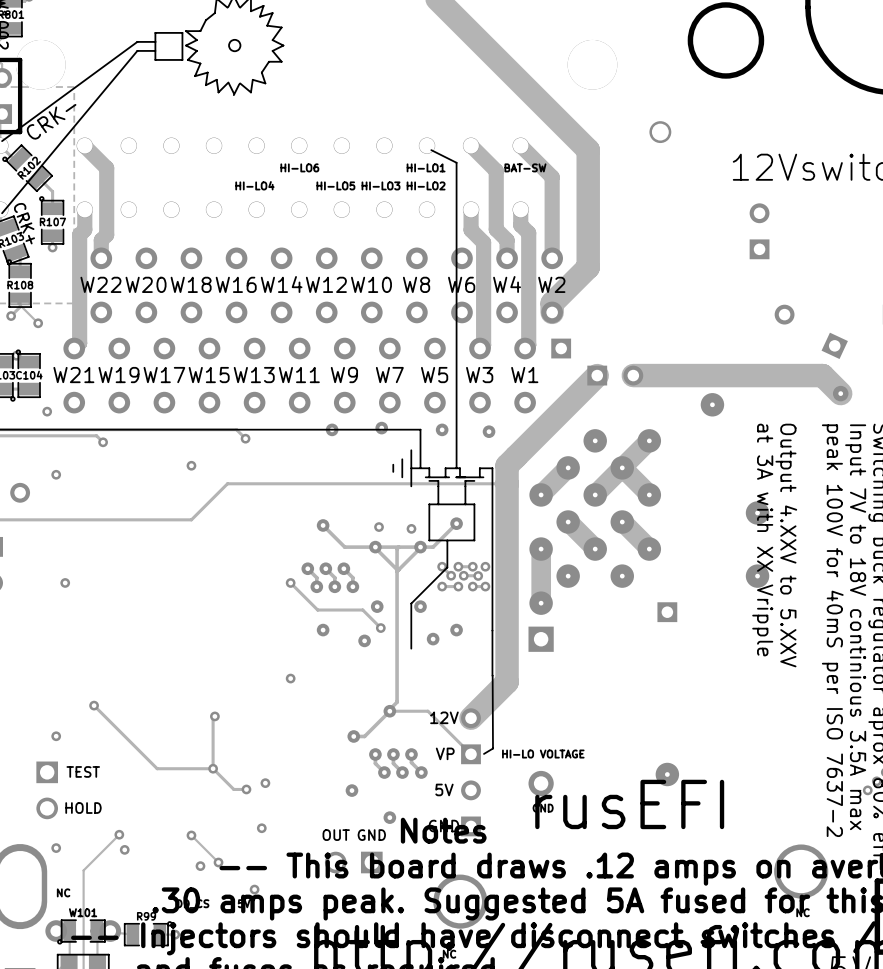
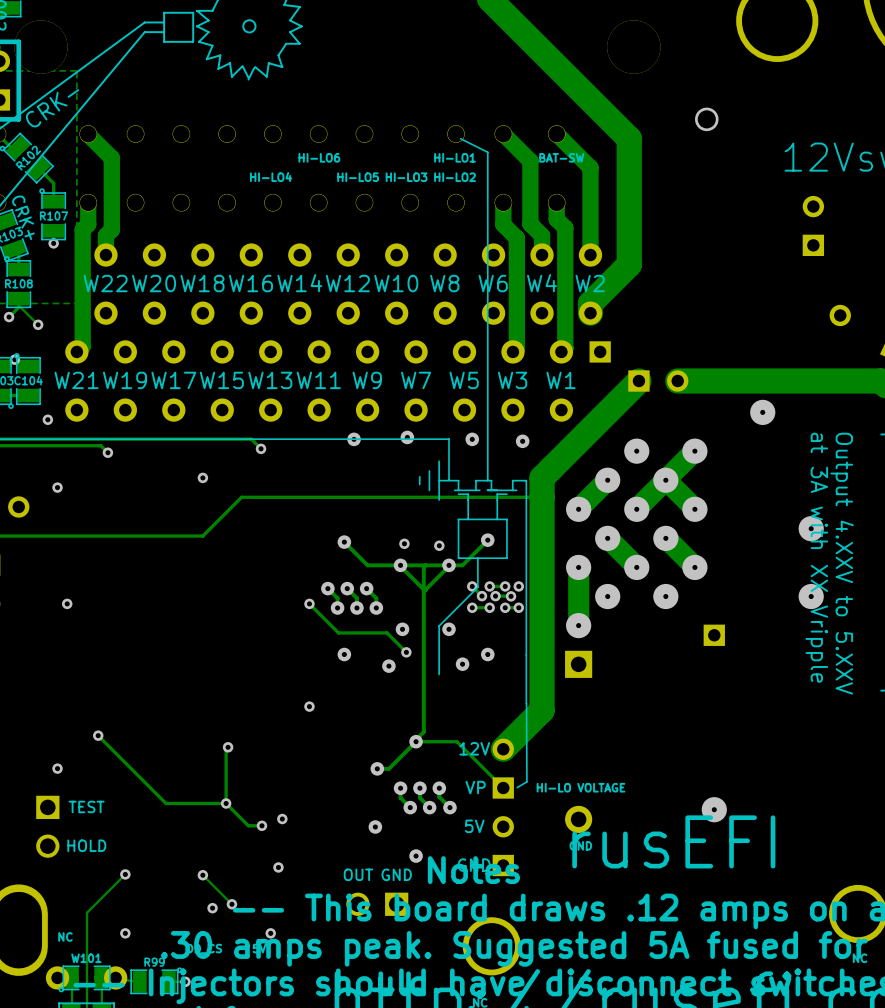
via: (56, 848) -> none
via: (124, 849) -> none
via: none -> (125, 933)

